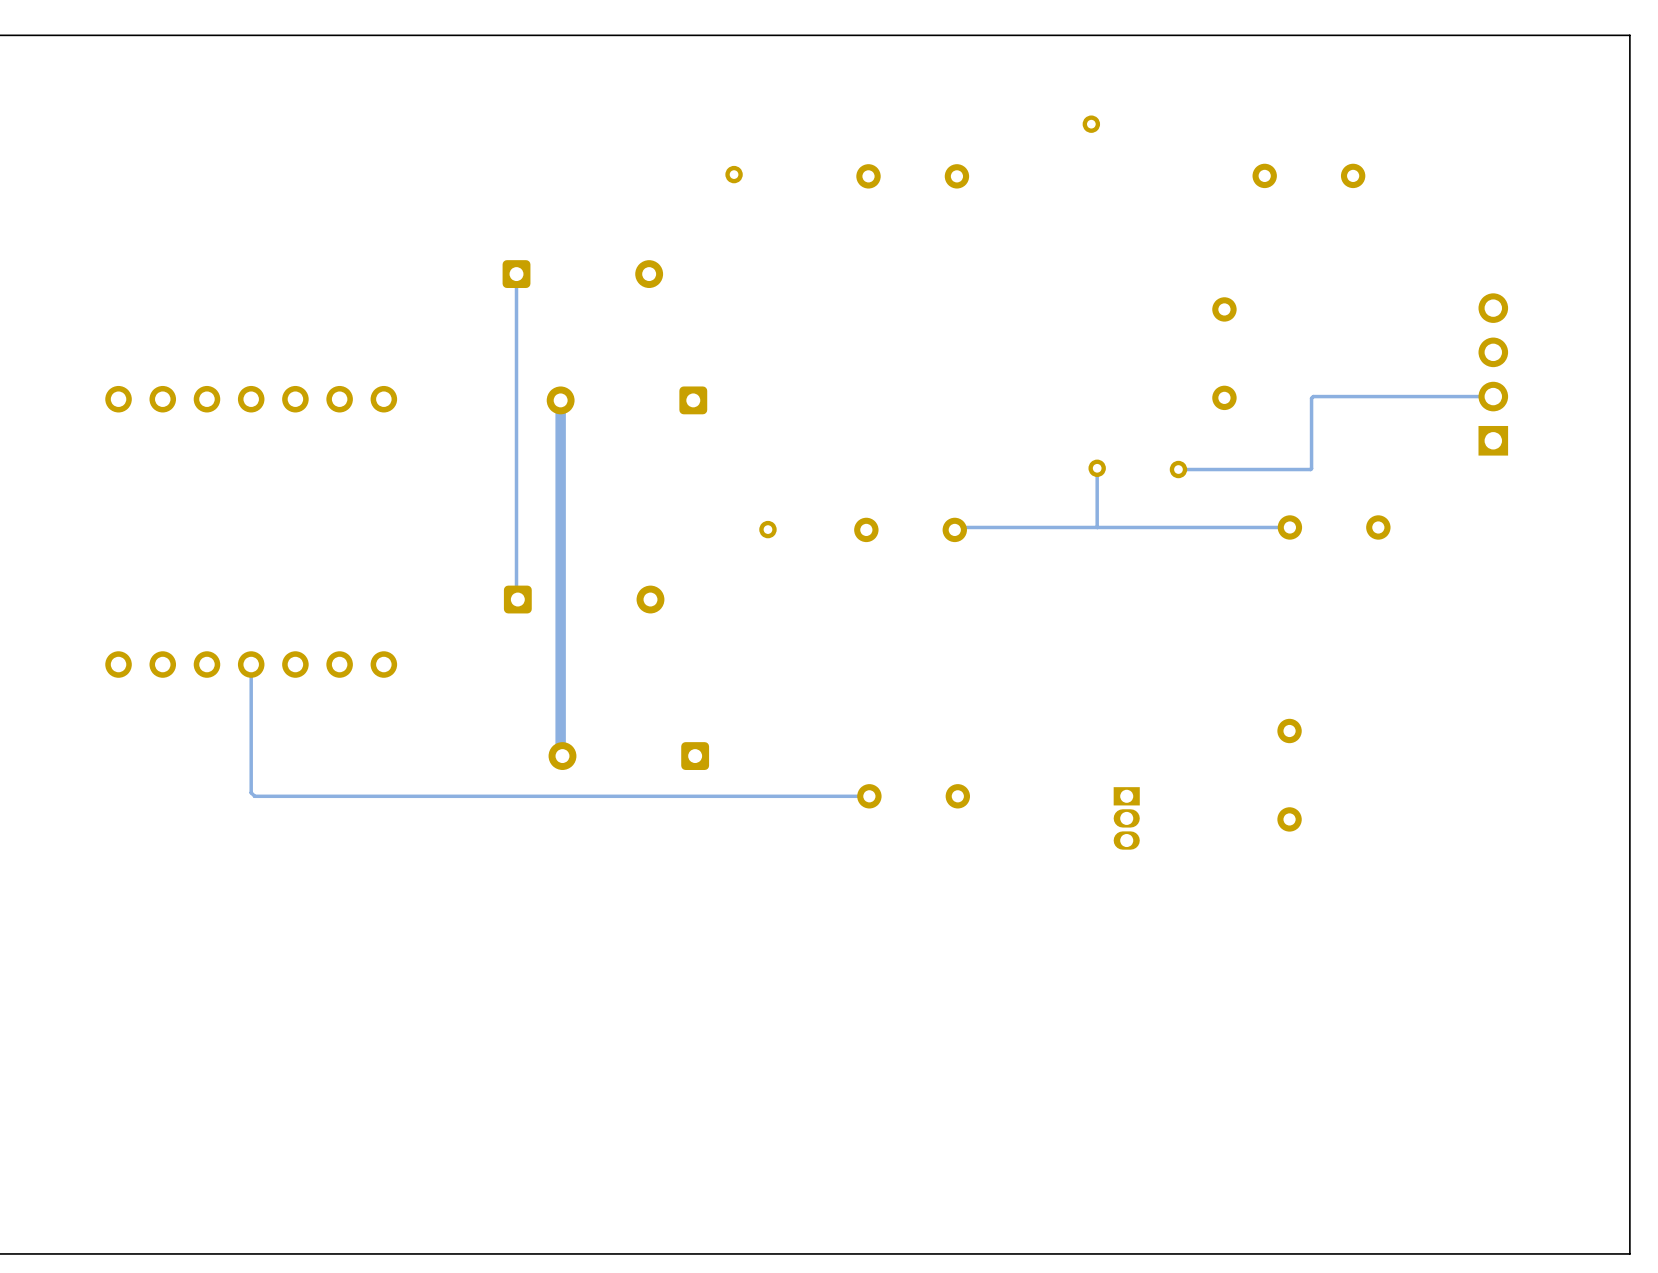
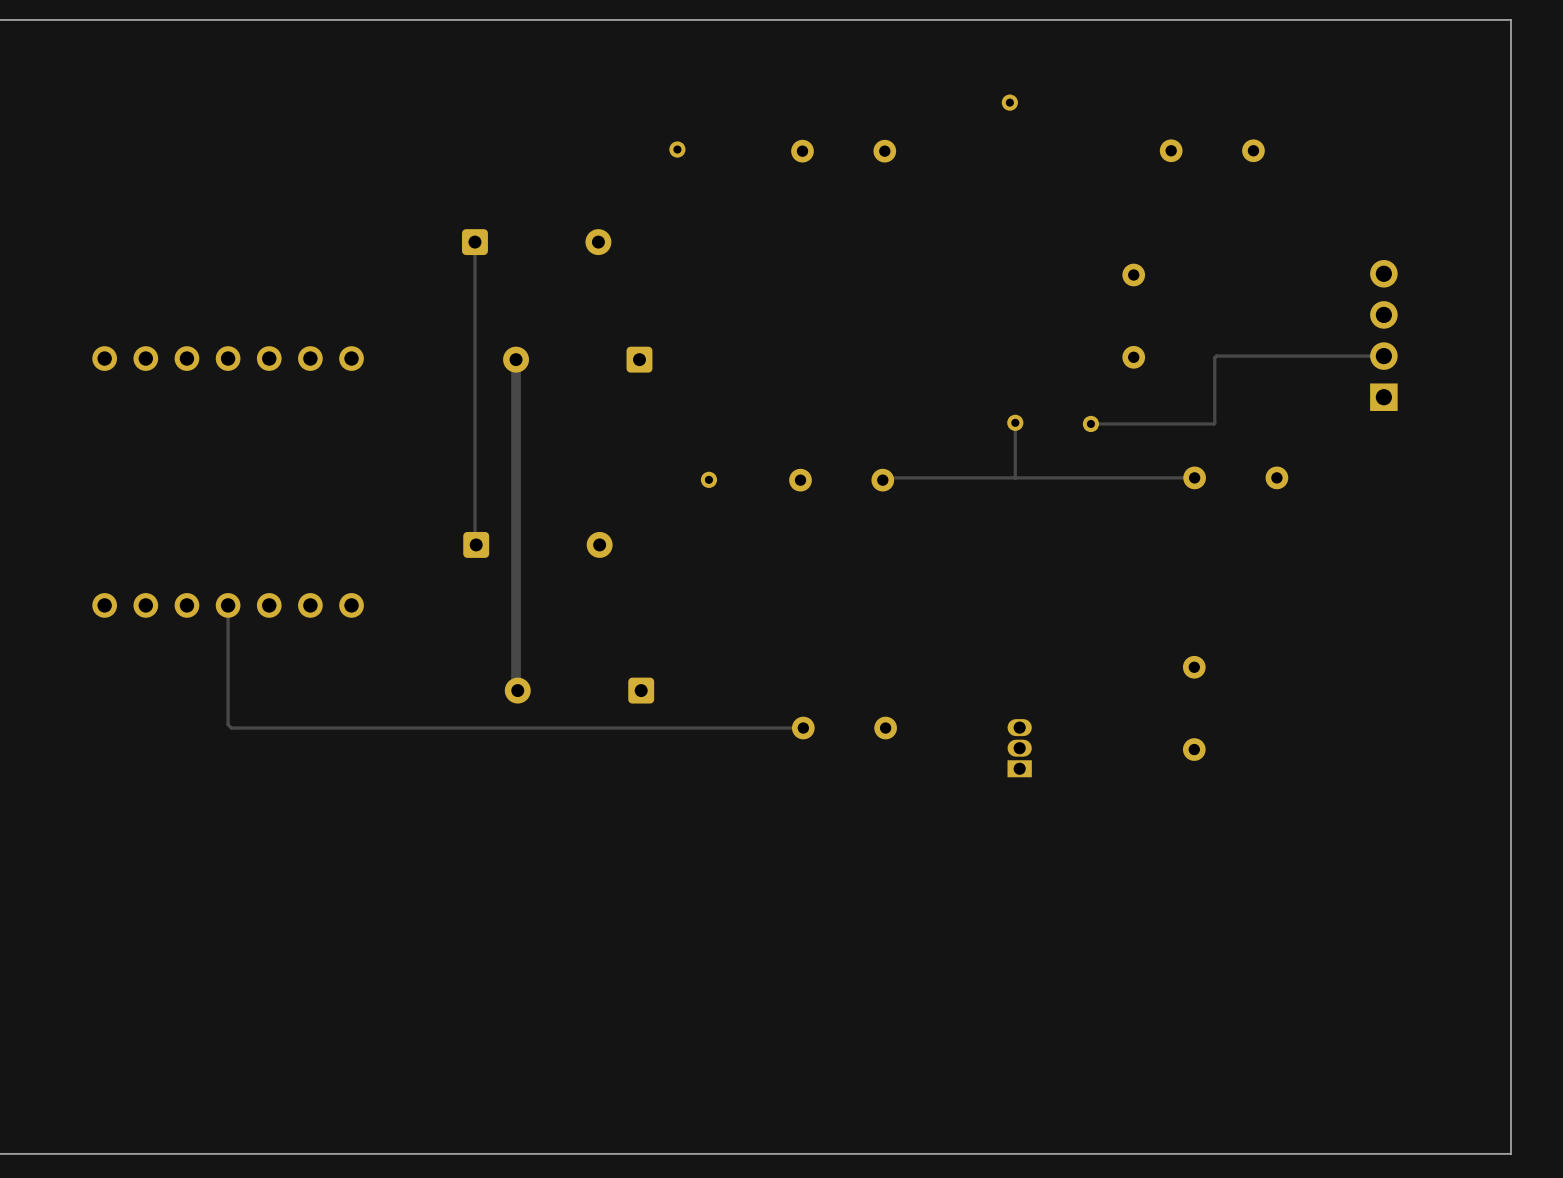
part rotation: 0° (1126, 818) -> 180° (1019, 748)

